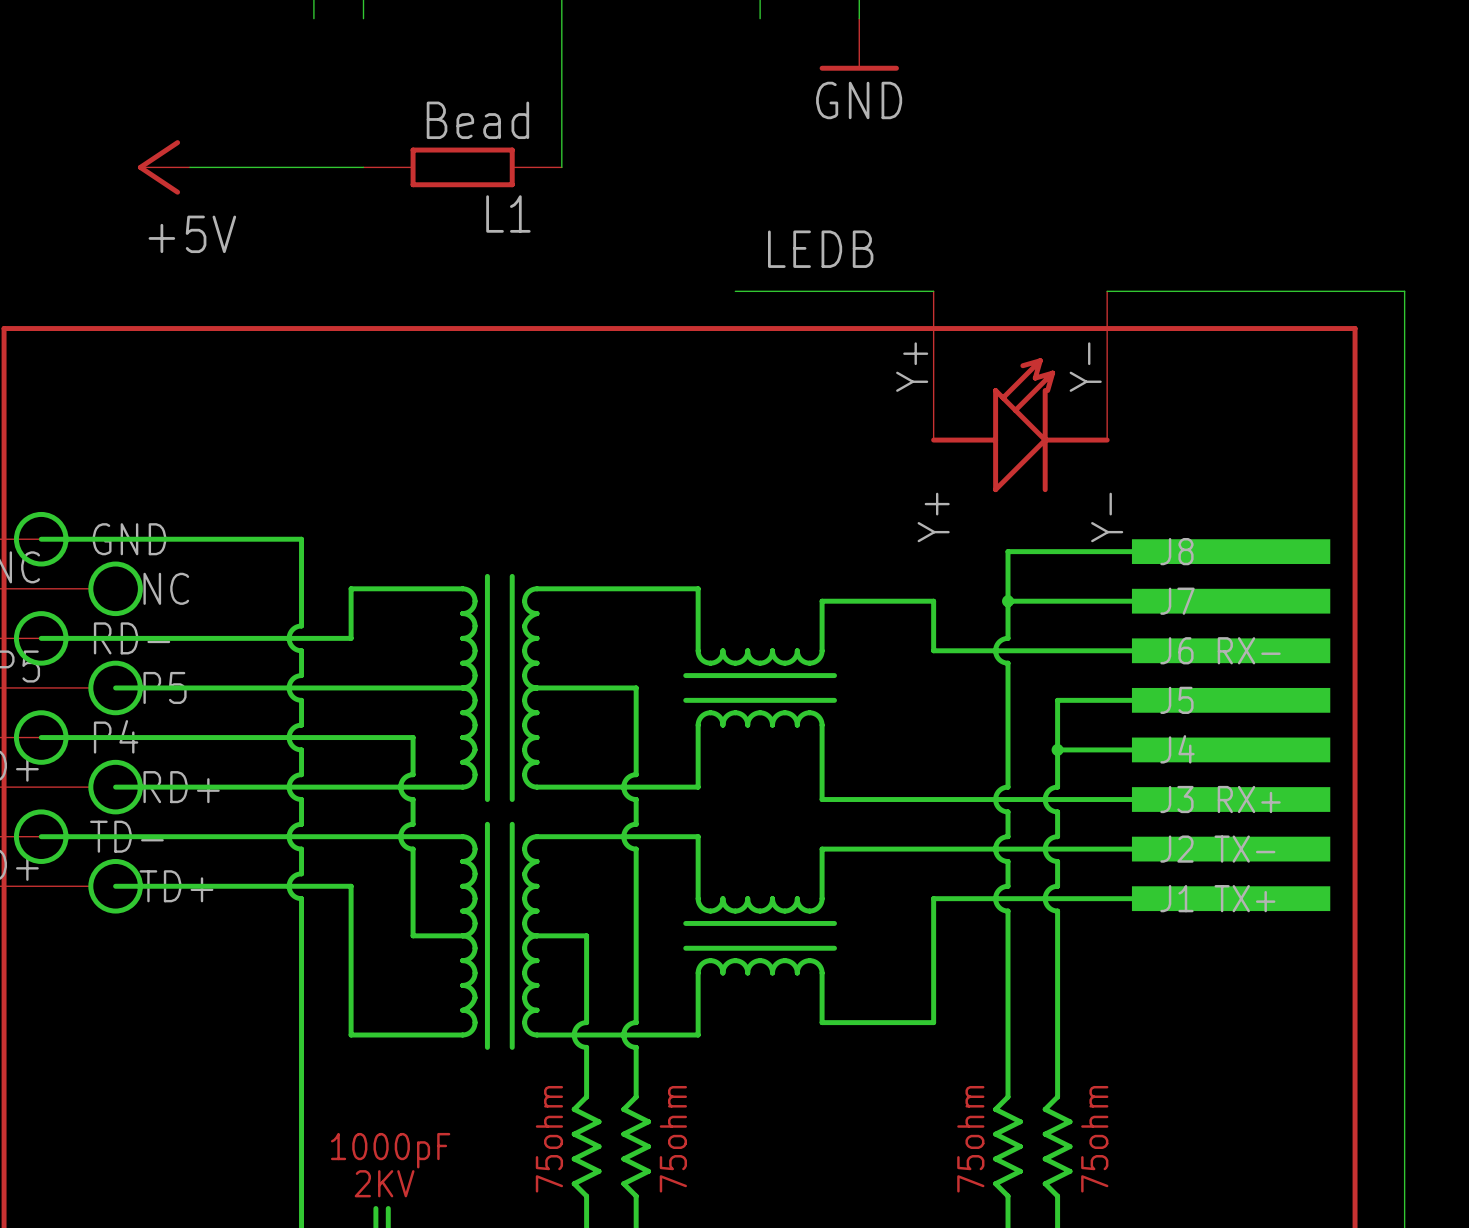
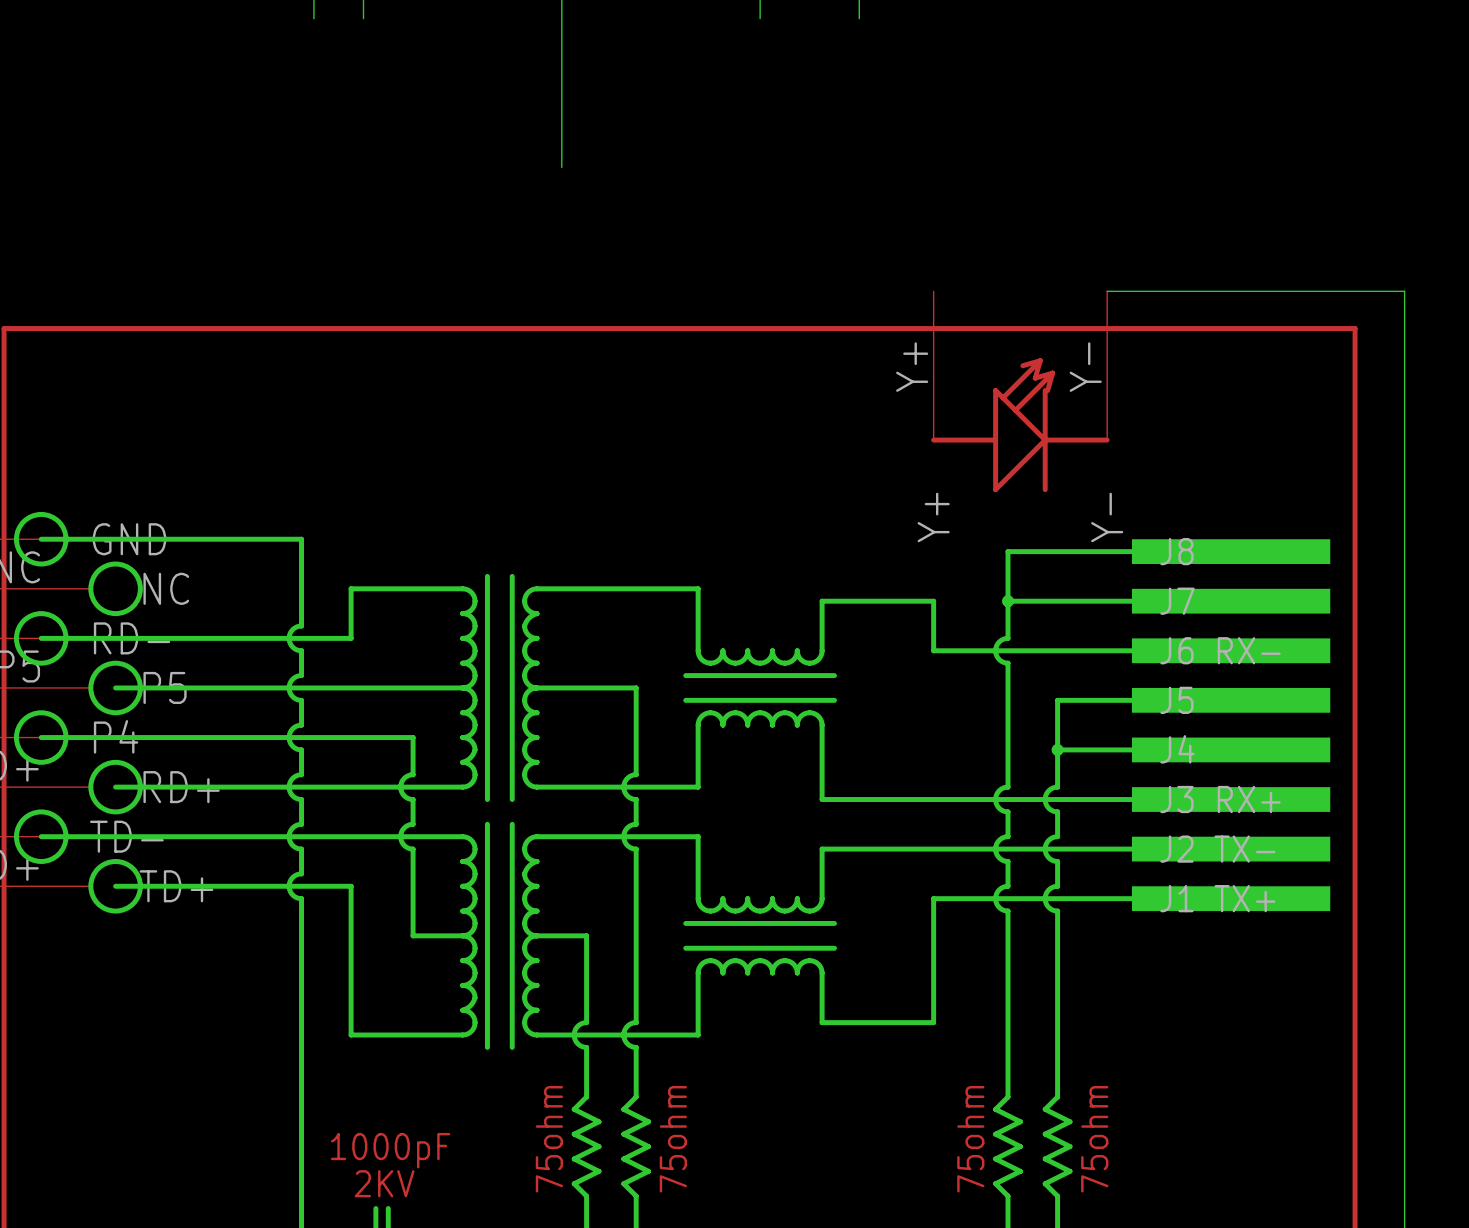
power symbol: GND (859, 44) -> none
power symbol: +5V (163, 167) -> none
wire: (189, 167) (363, 167) -> none
L1: Bead (462, 167) -> none
label: LEDB (820, 249) -> none
wire: (735, 291) (933, 291) -> none

